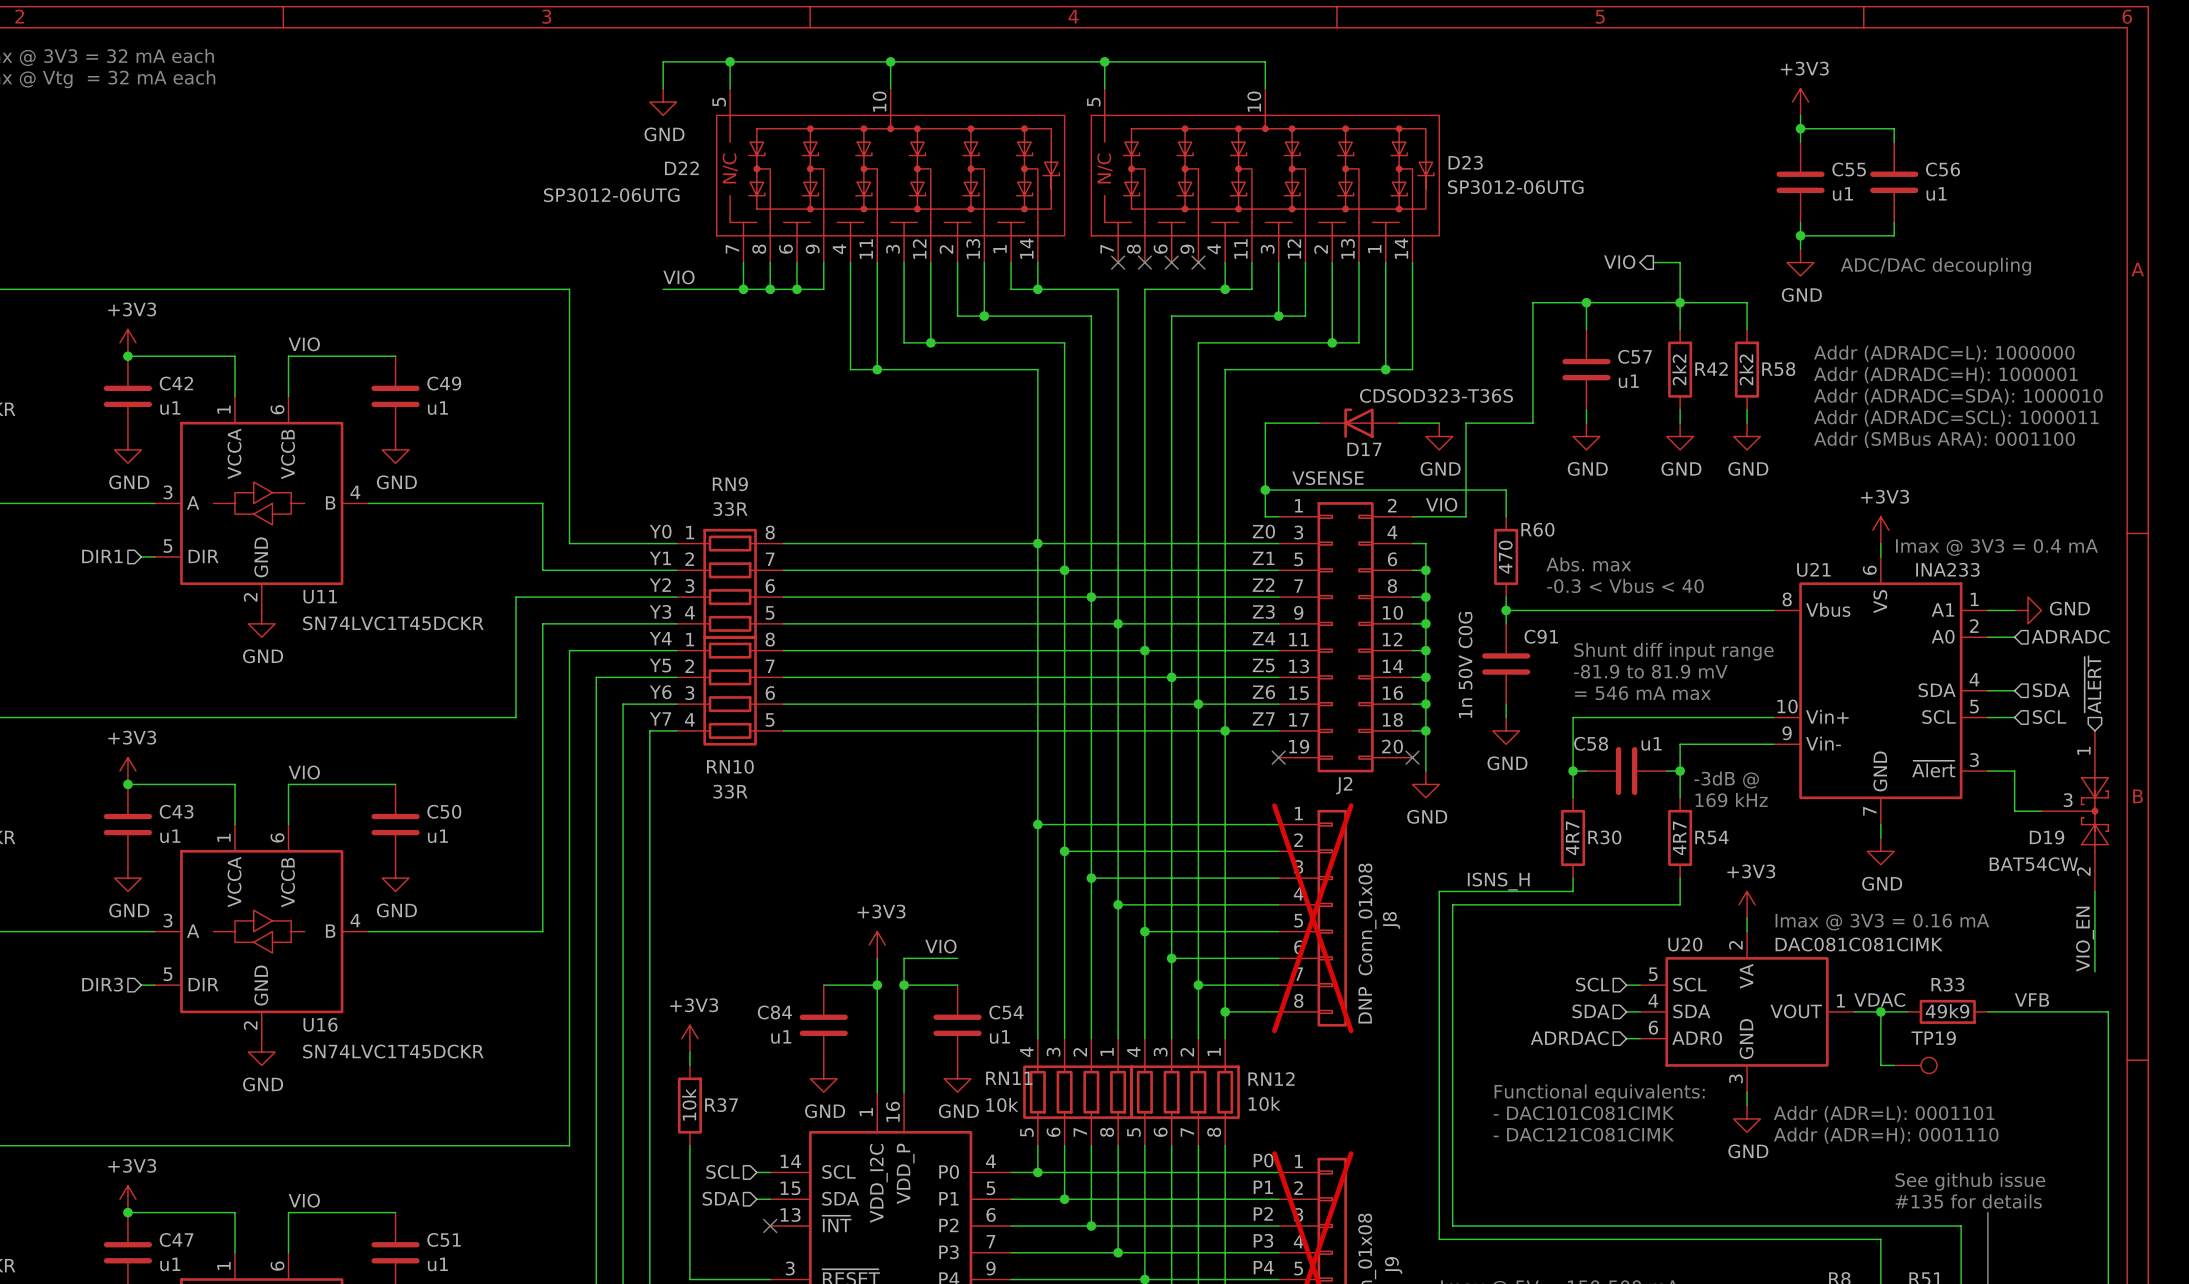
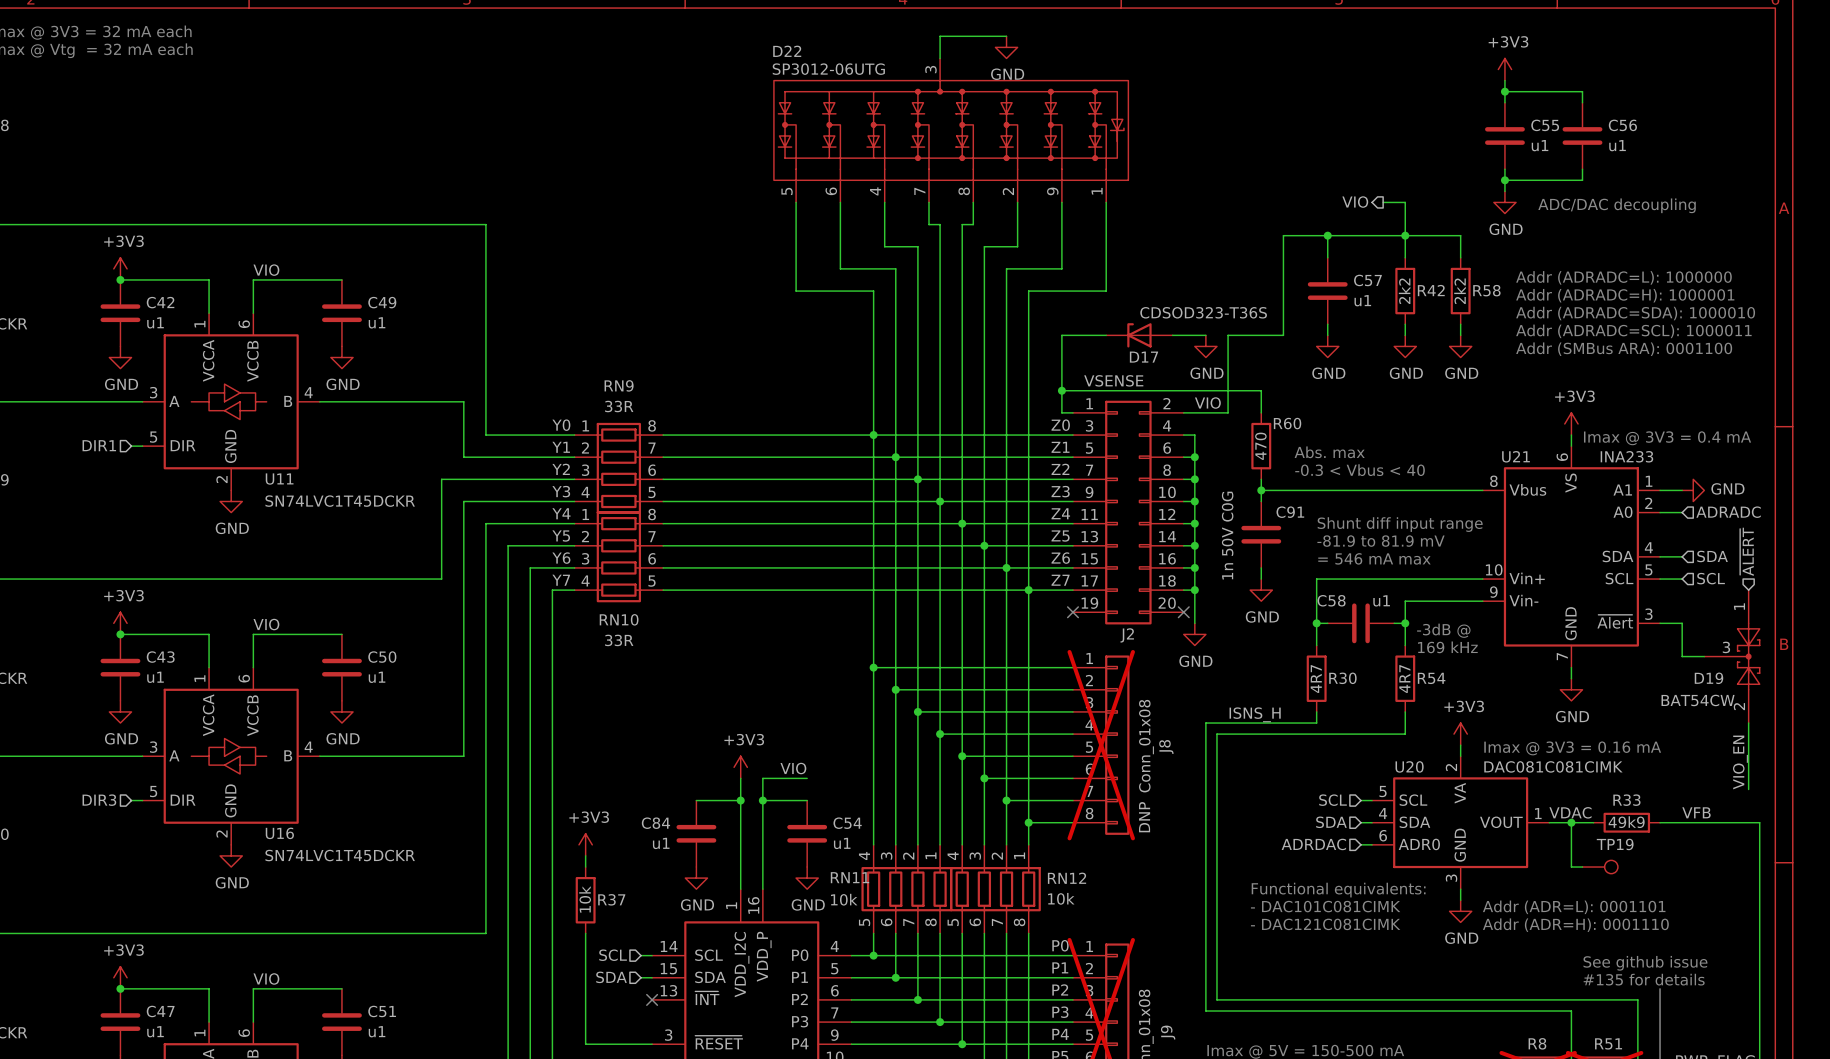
wire: (730, 61) (730, 88) -> none
junction: (730, 61) -> none
wire: (890, 61) (890, 88) -> none
junction: (890, 61) -> none
wire: (1104, 61) (1104, 88) -> none
junction: (1104, 61) -> none
wire: (1118, 61) (663, 61) (663, 88) -> (940, 36) (940, 58)
wire: (1198, 61) (1265, 61) (1265, 88) -> none
power symbol: none -> GND (1006, 47)
D22 symbol: [716, 88, 1065, 263] -> [773, 58, 1129, 203]
power symbol: GND (663, 102) -> none
D22 name position: D22 (681, 168) -> D22 (787, 51)
D23: SP3012-06UTG (1265, 175) -> none
D22 value position: SP3012-06UTG (611, 195) -> SP3012-06UTG (828, 69)
wire: (743, 262) (743, 289) -> none
wire: (770, 262) (770, 289) -> none
wire: (796, 262) (796, 289) -> none
wire: (823, 262) (823, 289) (663, 289) -> none
wire: (850, 262) (850, 369) (944, 369) -> (796, 202) (796, 291)
wire: (877, 262) (877, 369) -> none
wire: (904, 262) (904, 342) (997, 342) -> (840, 202) (840, 268)
wire: (930, 262) (930, 342) -> none
wire: (957, 262) (957, 316) (1051, 316) -> (884, 202) (884, 246)
wire: (984, 262) (984, 316) -> none
wire: (1011, 262) (1011, 289) (1104, 289) -> (929, 202) (929, 224)
wire: (1037, 262) (1037, 289) -> none
no-connect mark: (1118, 262) -> none
no-connect mark: (1144, 262) -> none
no-connect mark: (1171, 262) -> none
no-connect mark: (1198, 262) -> none
wire: (1225, 262) (1225, 289) -> none
wire: (1251, 262) (1251, 289) (1158, 289) -> (973, 202) (973, 224)
wire: (1278, 262) (1278, 316) -> none
wire: (1305, 262) (1305, 316) (1211, 316) -> (1017, 202) (1017, 246)
wire: (1332, 262) (1332, 342) -> none
wire: (1358, 262) (1358, 342) (1265, 342) -> (1061, 202) (1061, 268)
wire: (1385, 262) (1385, 369) -> none
wire: (1412, 262) (1412, 369) (1318, 369) -> (1106, 202) (1106, 291)
label: VIO (678, 277) -> none
junction: (743, 289) -> none
junction: (770, 289) -> none
junction: (796, 289) -> none
junction: (1037, 289) -> none
junction: (1225, 289) -> none
junction: (984, 316) -> none
junction: (1278, 316) -> none
junction: (930, 342) -> none
junction: (1332, 342) -> none
junction: (877, 369) -> none
junction: (1385, 369) -> none

